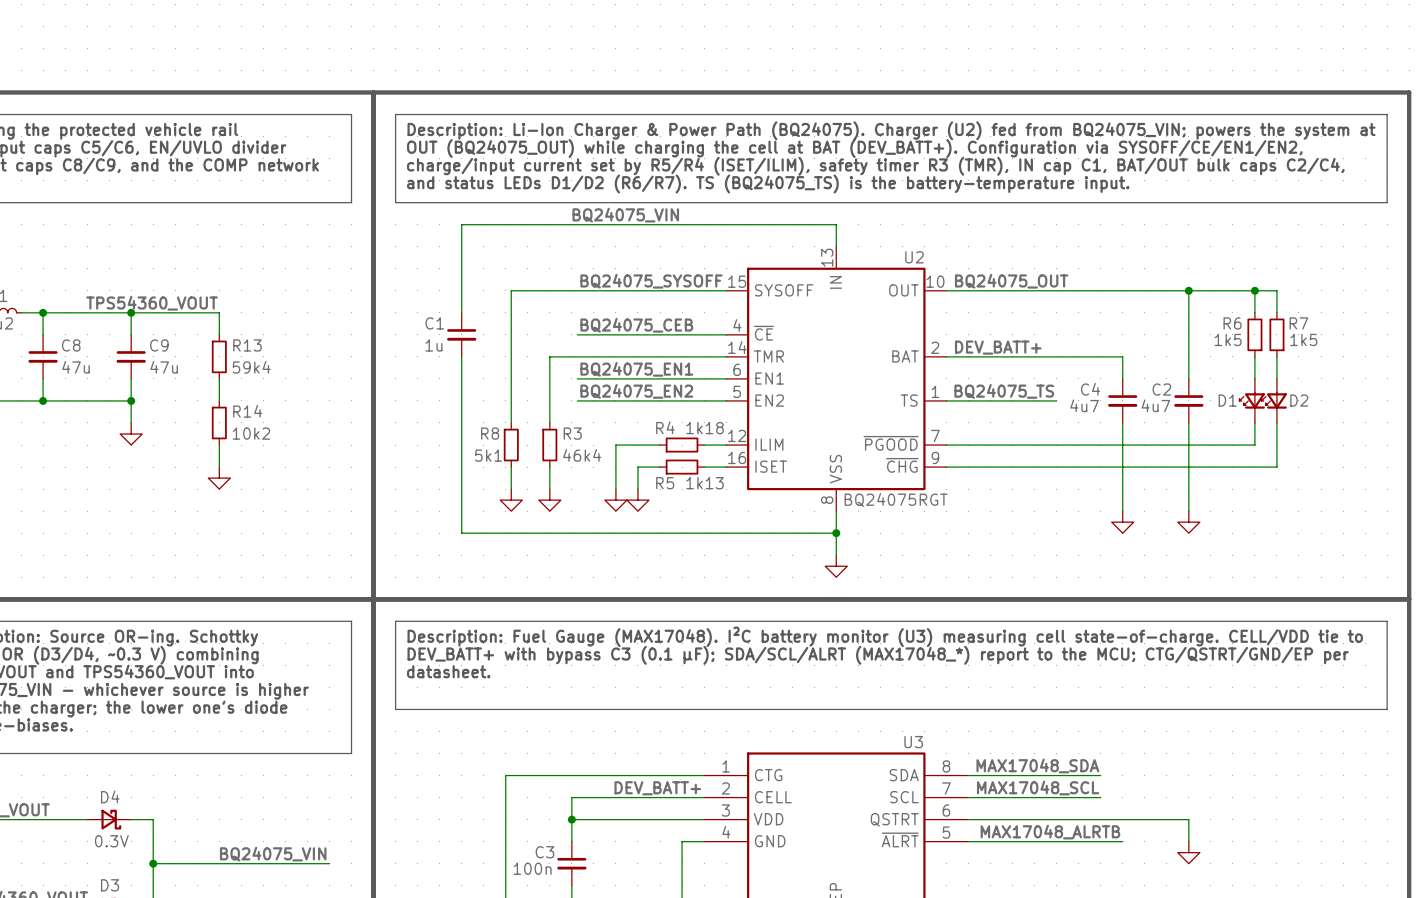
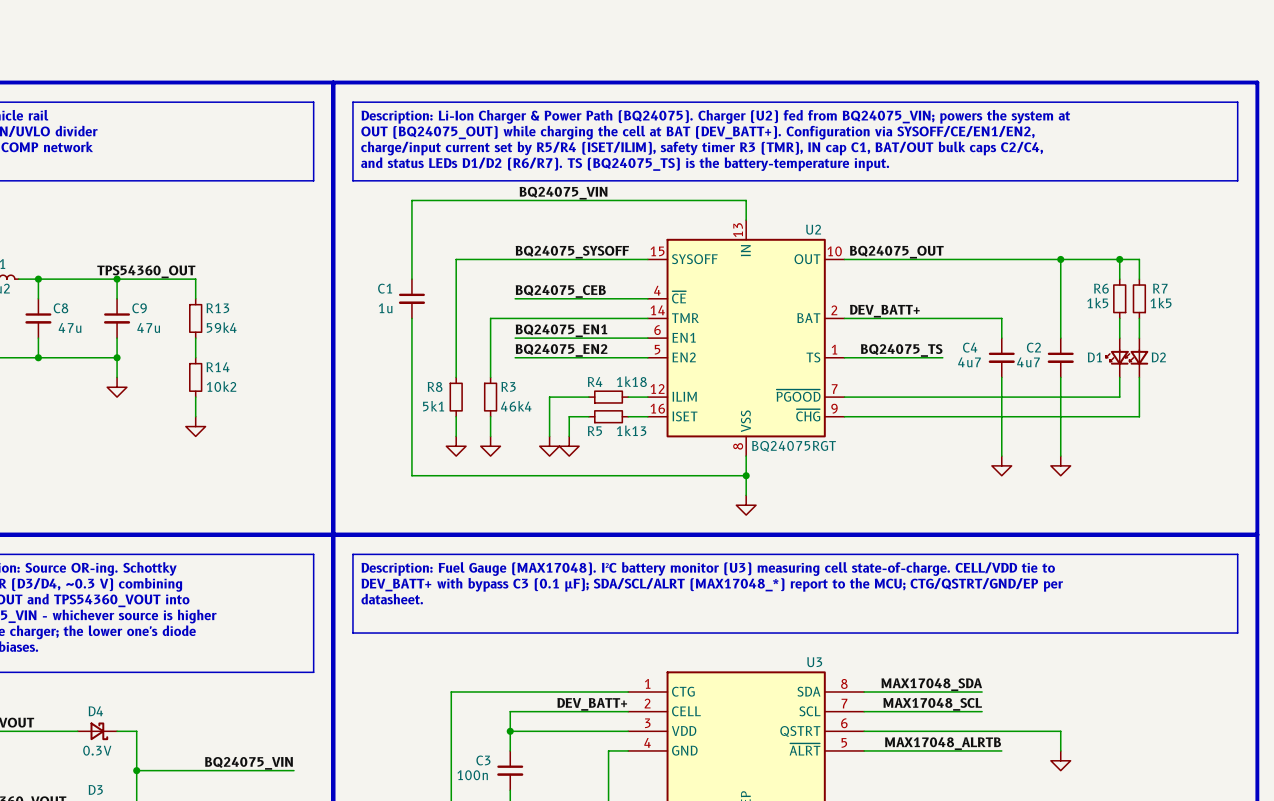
label: TPS54360_VOUT (152, 303) -> TPS54360_OUT (146, 271)

